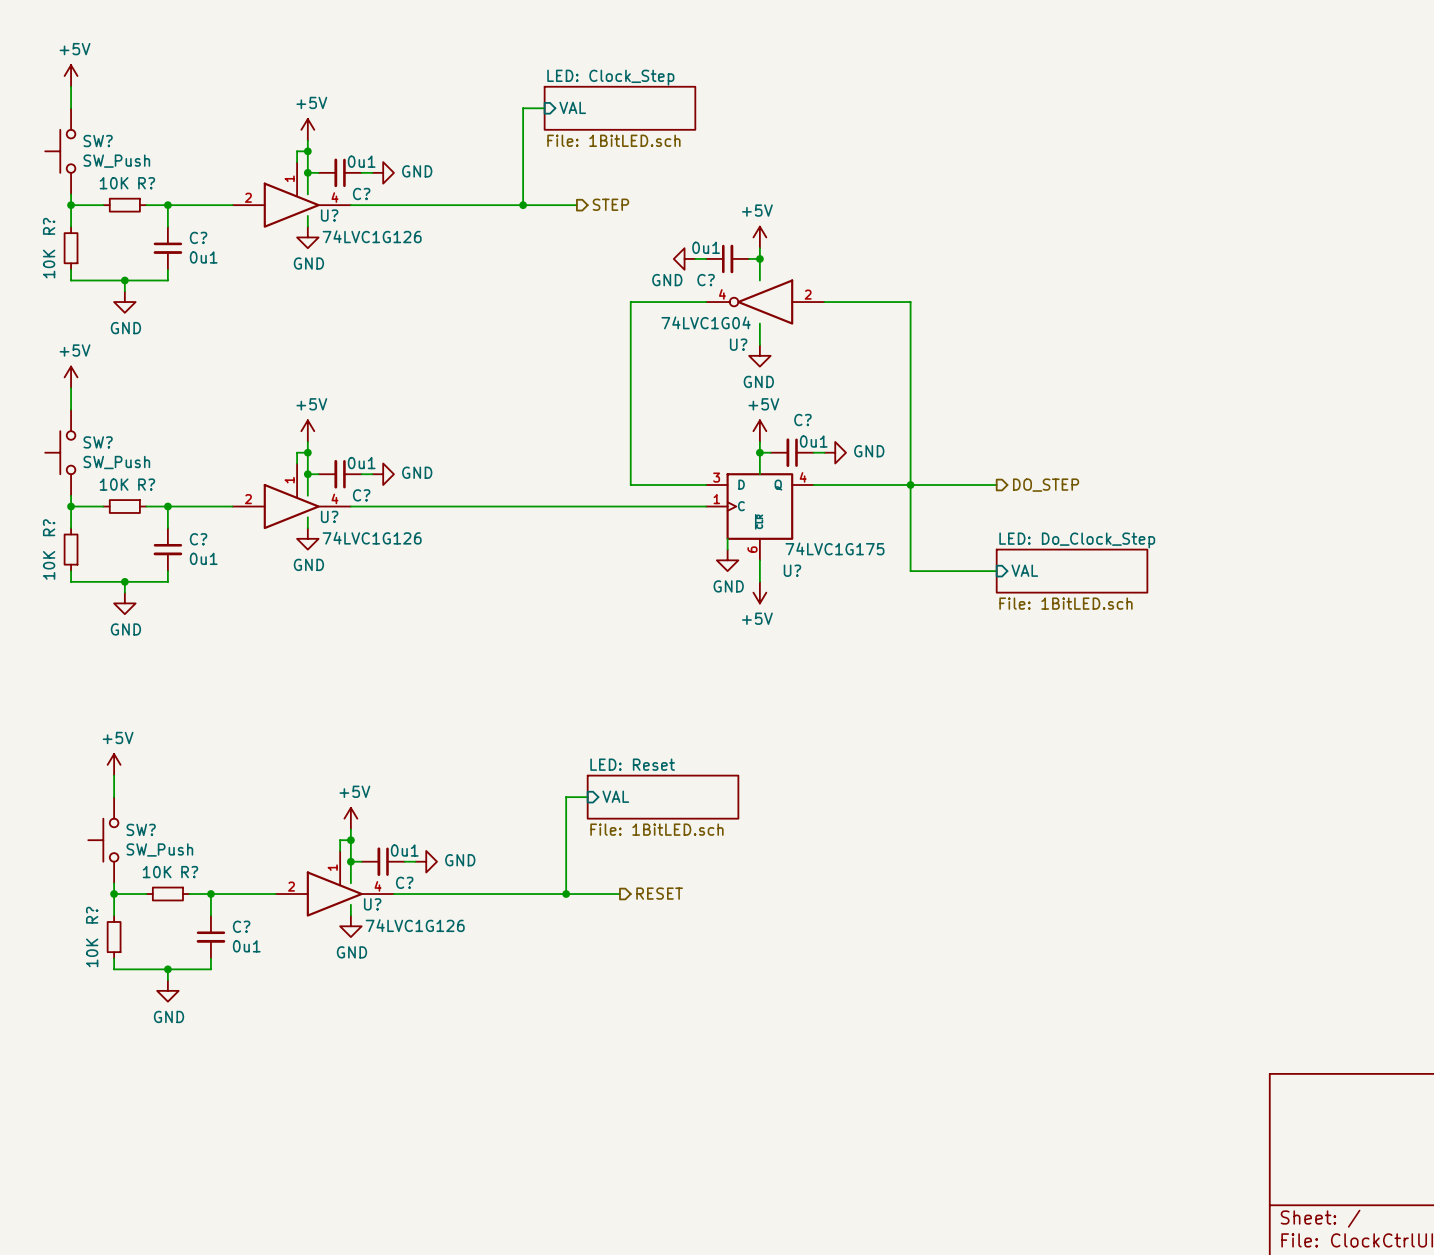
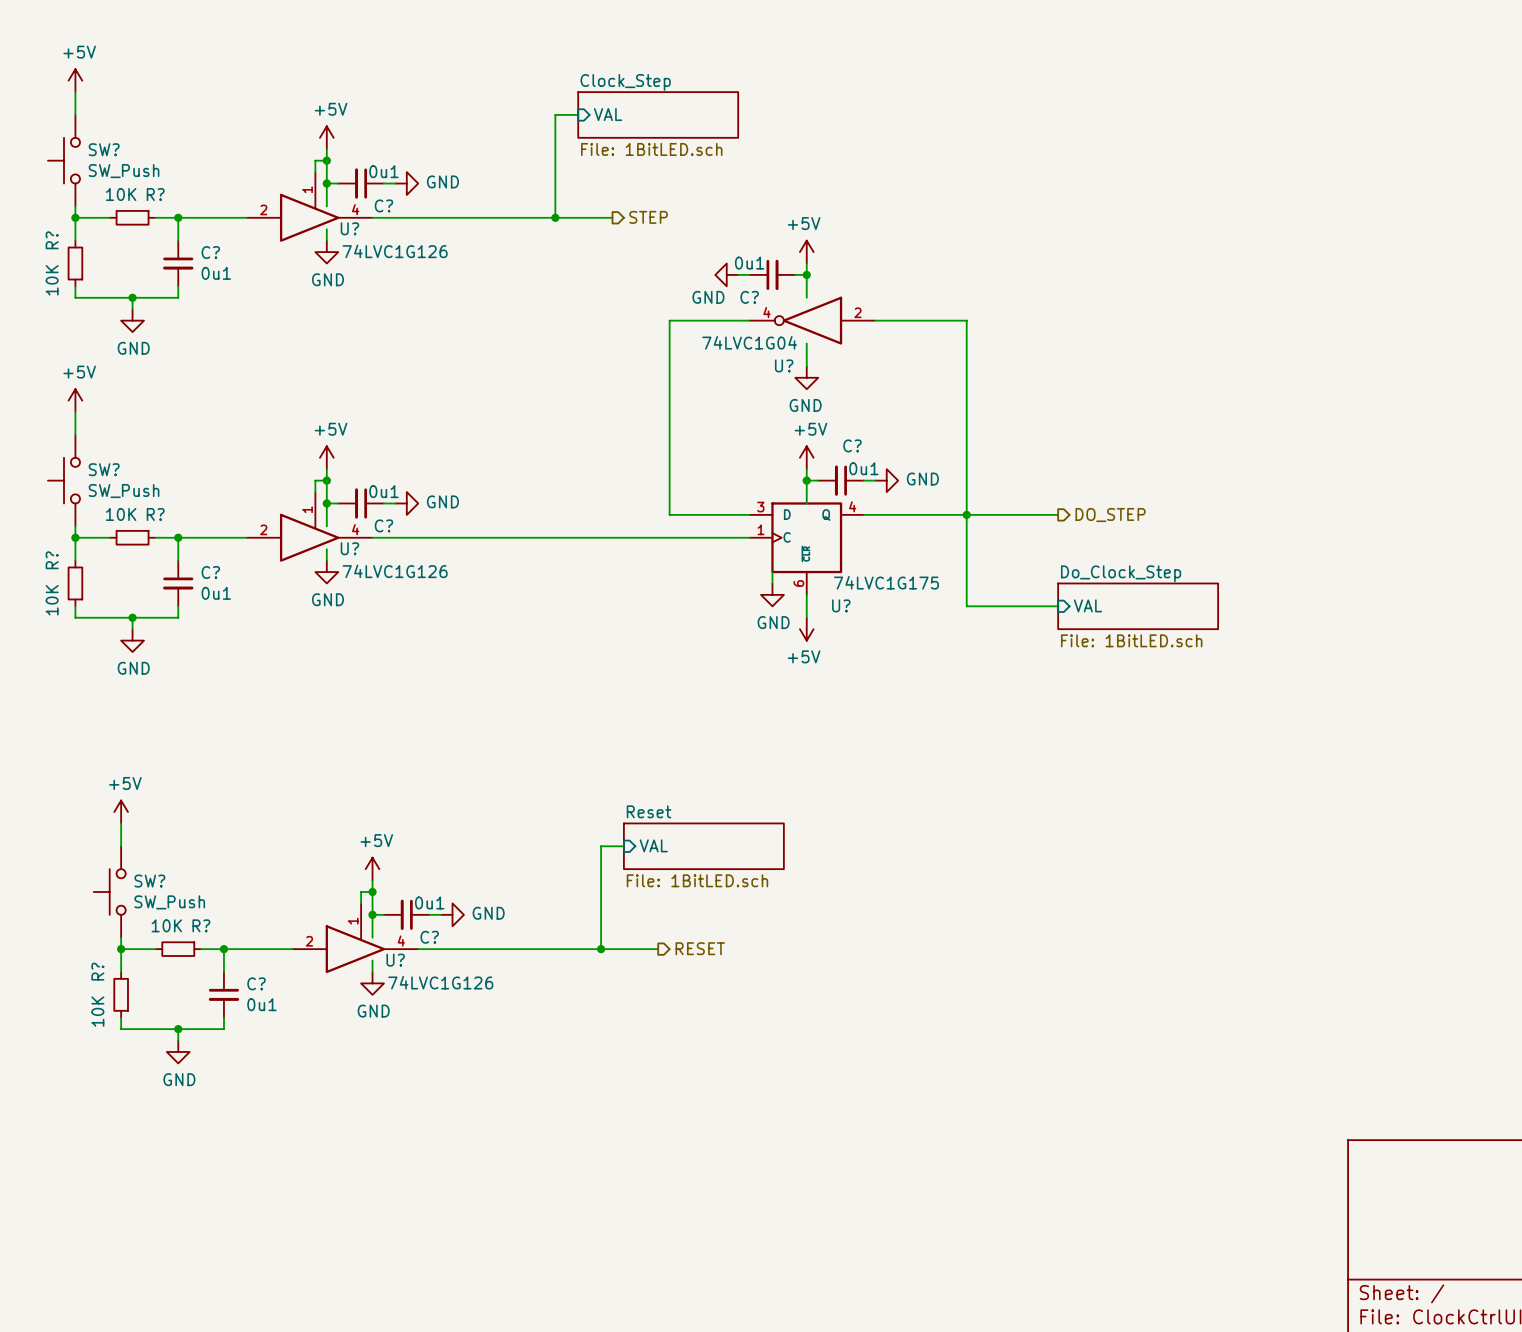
sheet Clock_Step name: LED: Clock_Step (610, 77) -> Clock_Step (625, 82)
sheet Do_Clock_Step name: LED: Do_Clock_Step (1077, 540) -> Do_Clock_Step (1121, 573)
sheet Reset name: LED: Reset (632, 764) -> Reset (649, 811)

